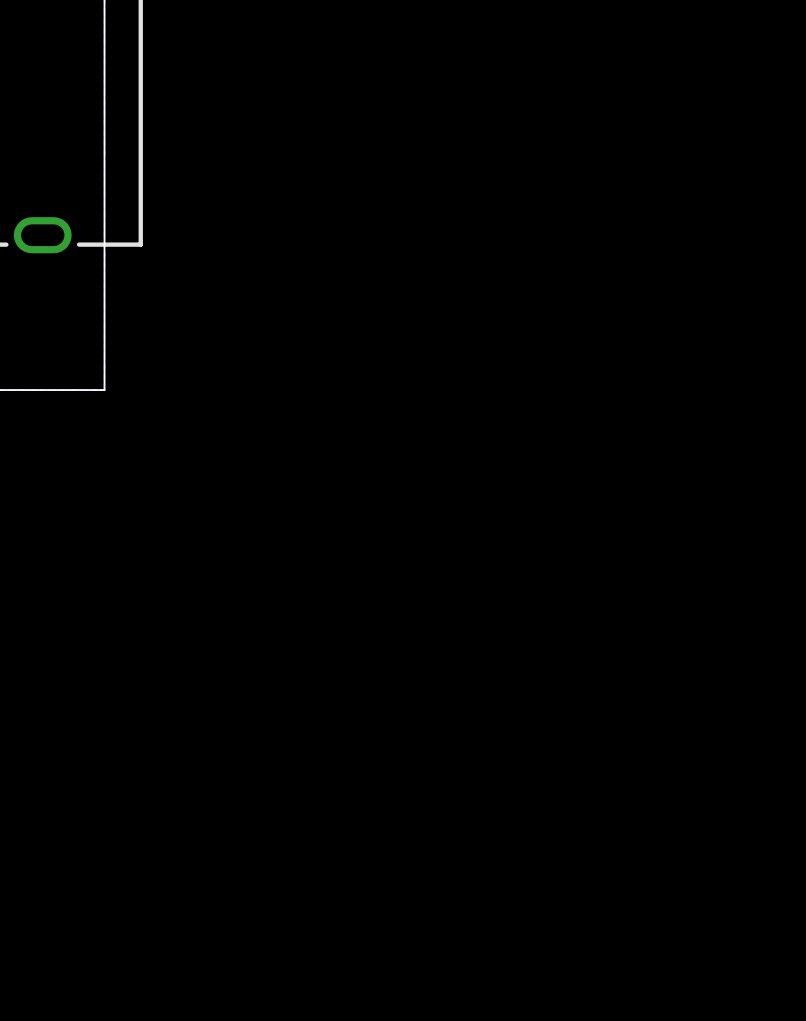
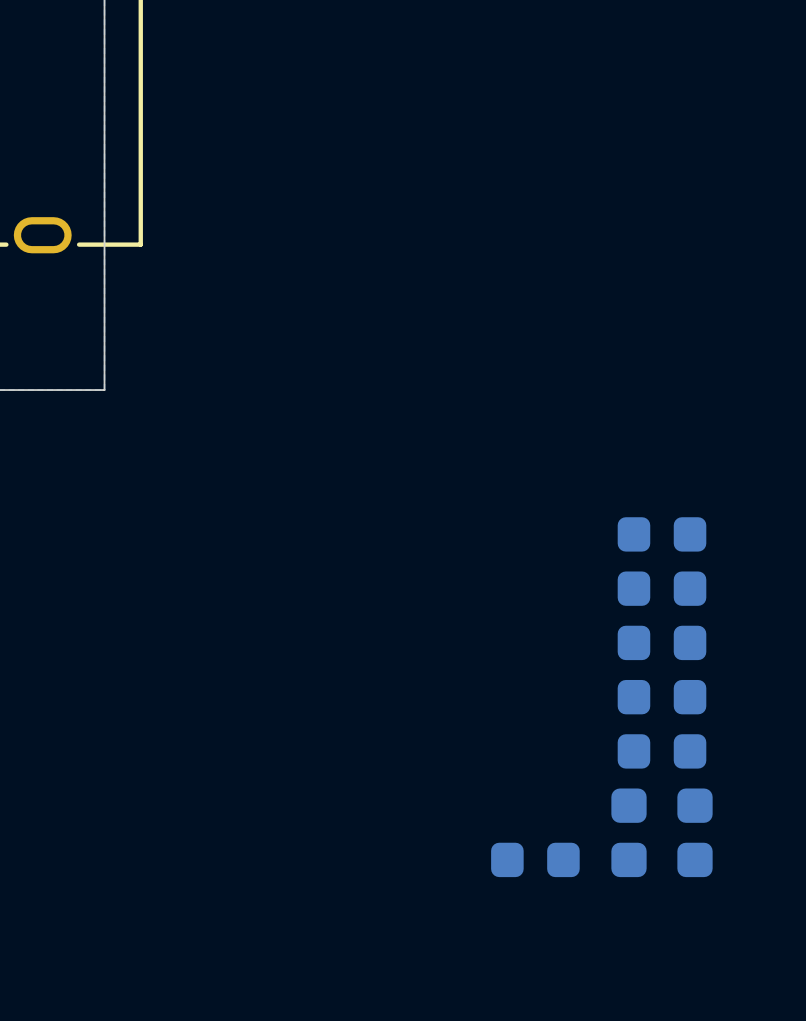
part: none -> (662, 534)
part: none -> (662, 588)
part: none -> (662, 642)
part: none -> (662, 697)
part: none -> (662, 751)
part: none -> (662, 805)
part: none -> (535, 859)
part: none -> (662, 859)

